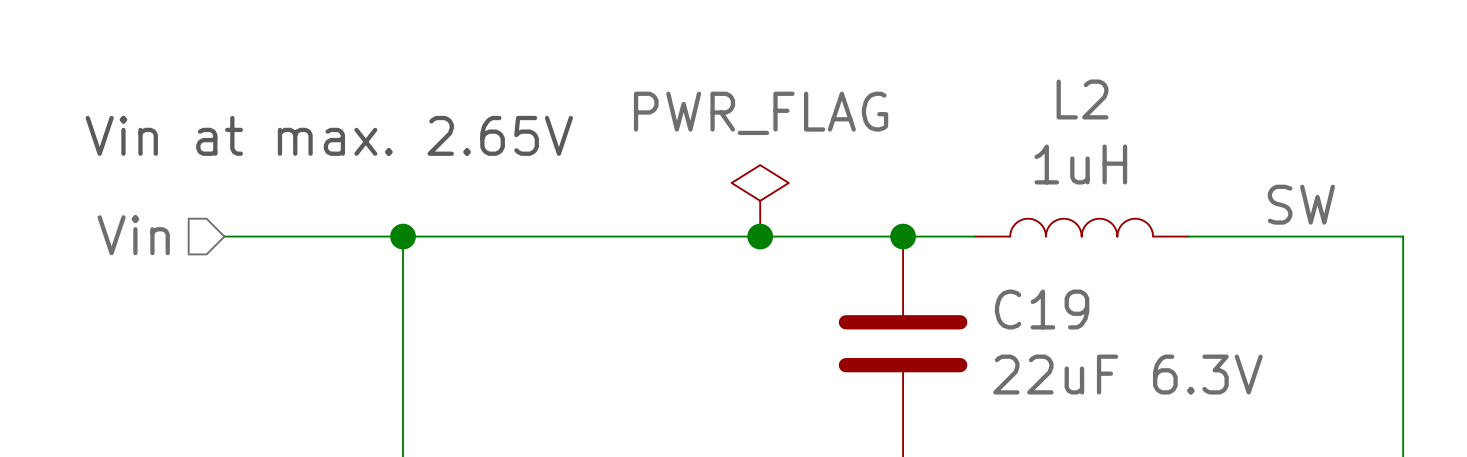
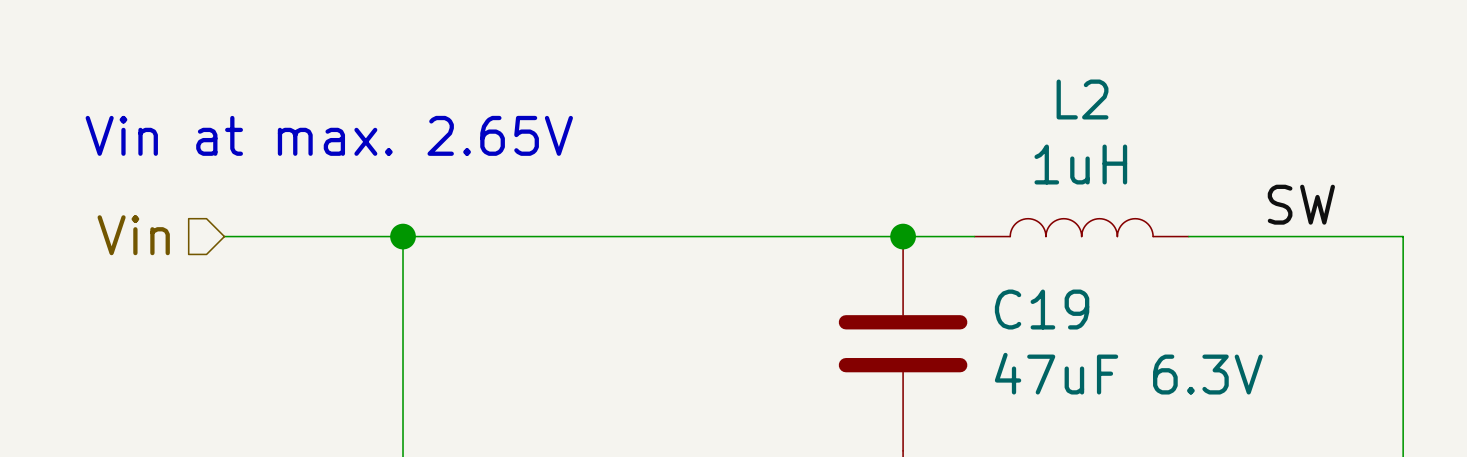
power symbol: PWR_FLAG (760, 200) -> none
junction: (760, 236) -> none
C19 value: 22uF 6.3V (1127, 374) -> 47uF 6.3V (1128, 373)

